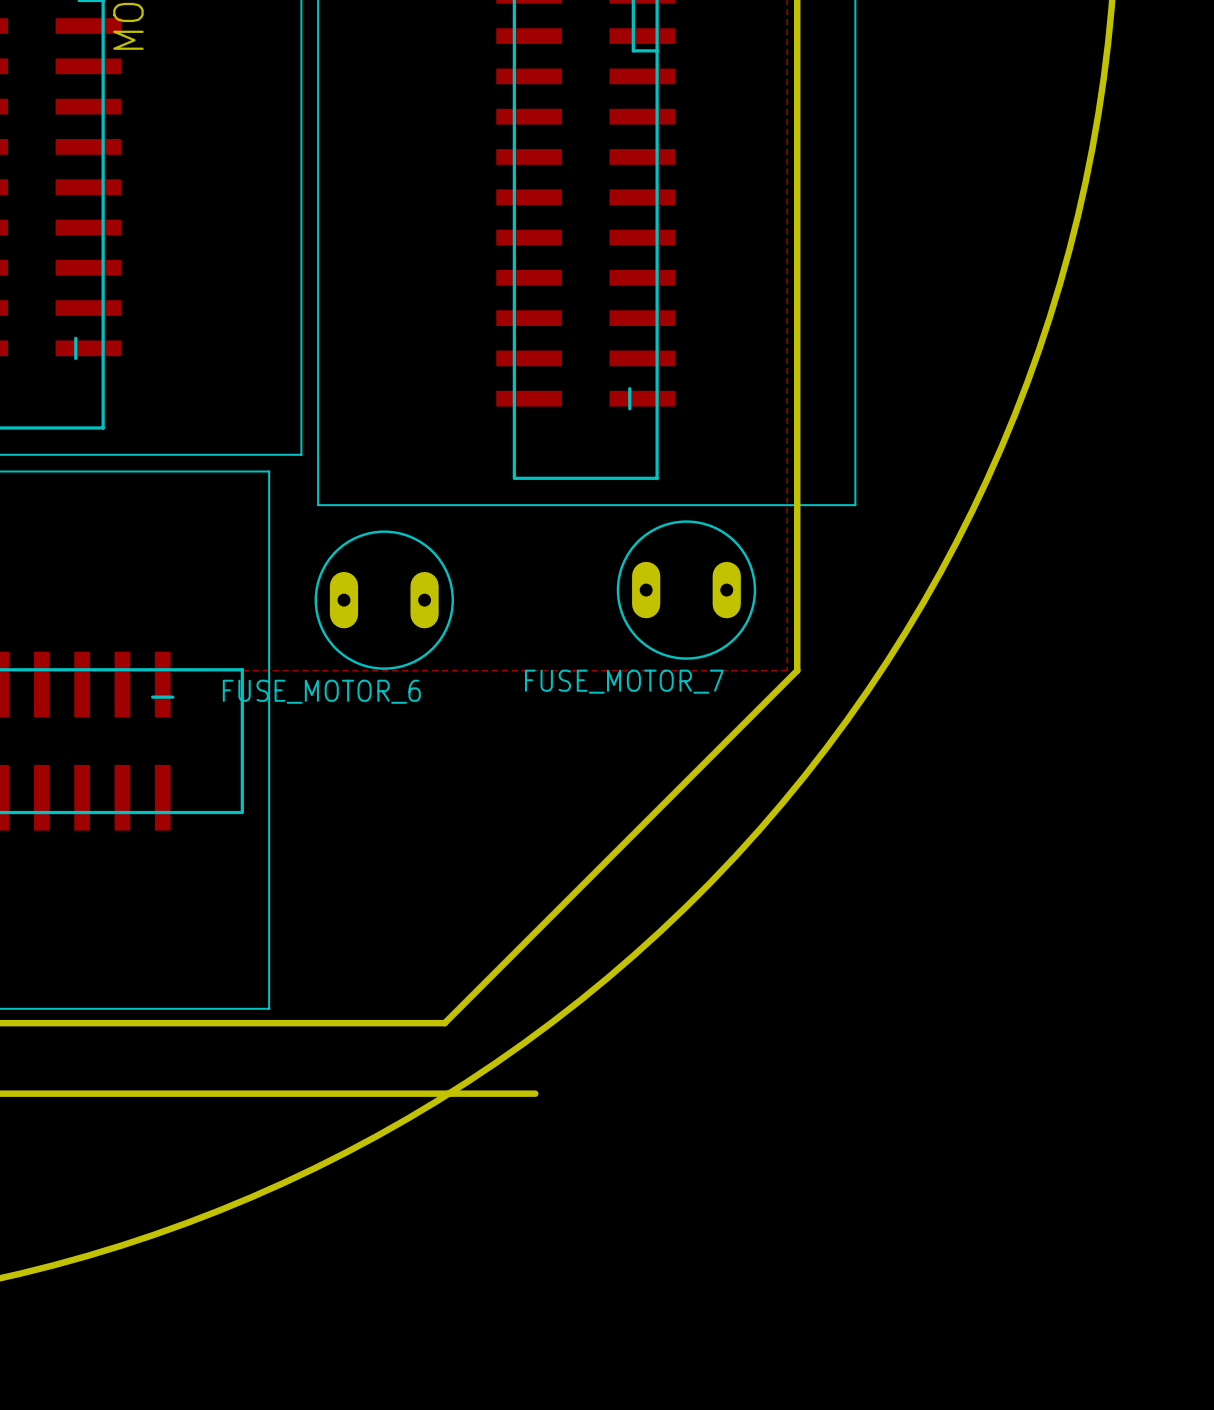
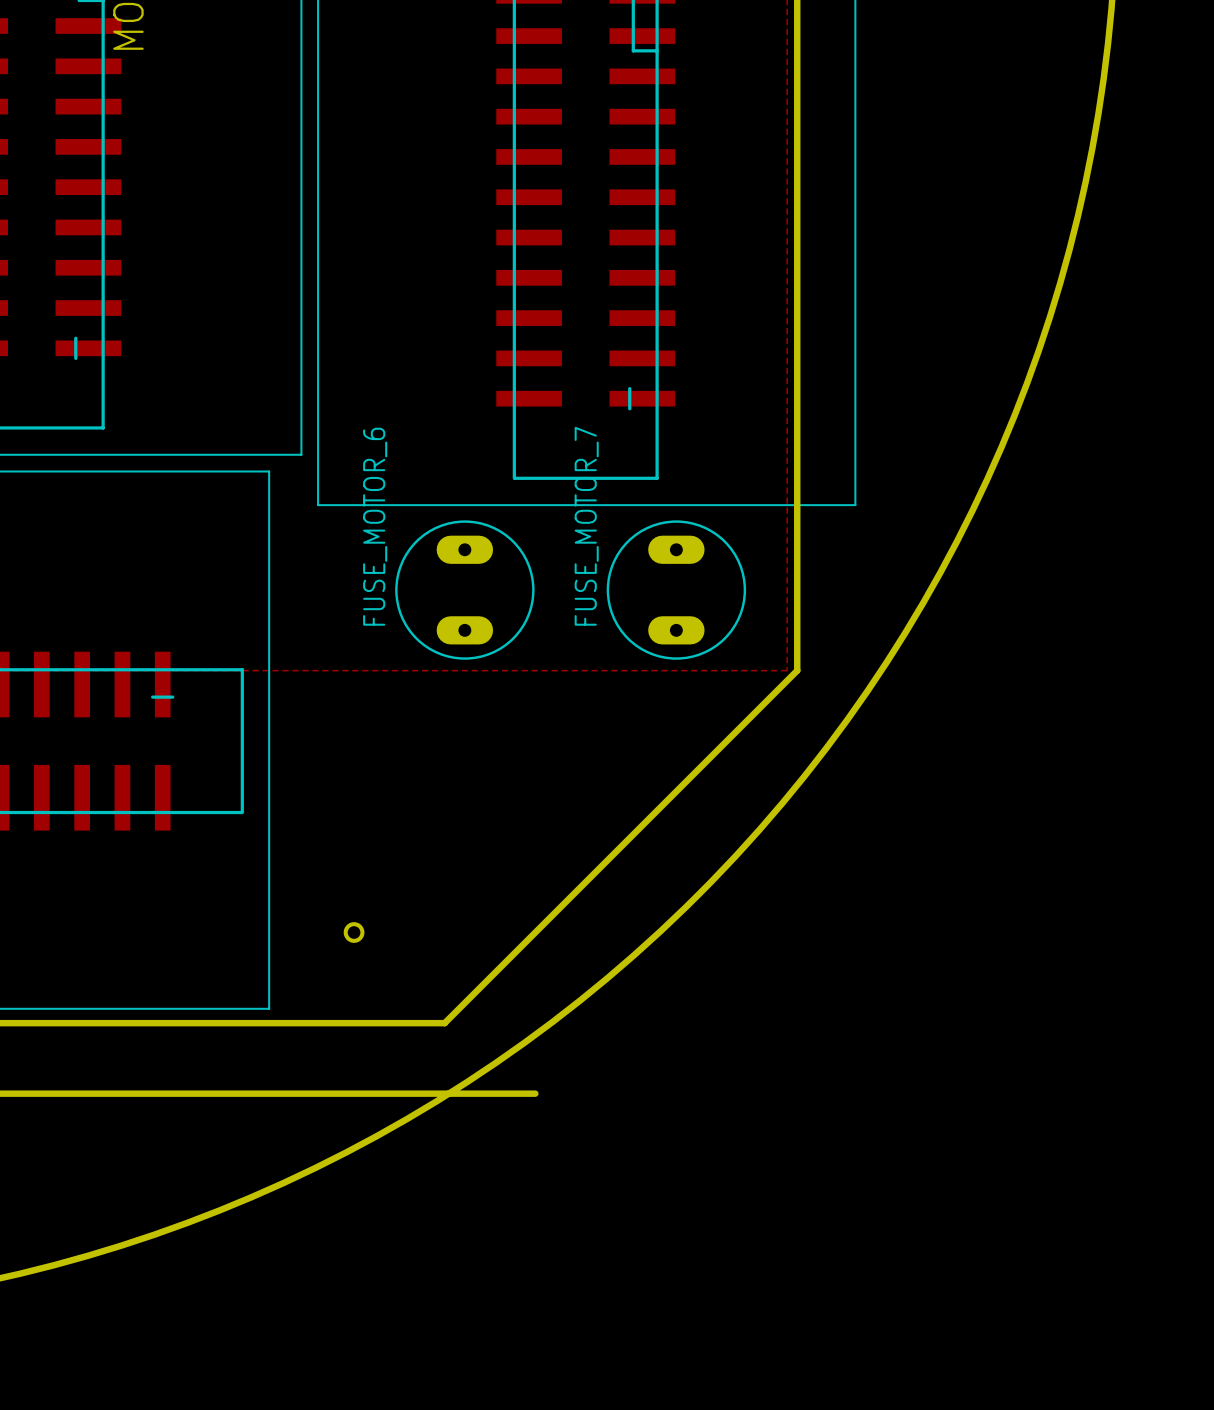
FUSE_MOTOR_7 rotation: 0° (686, 590) -> 90° clockwise (676, 590)
FUSE_MOTOR_6 rotation: 0° (384, 600) -> 90° clockwise (464, 590)
part: none -> (354, 932)

